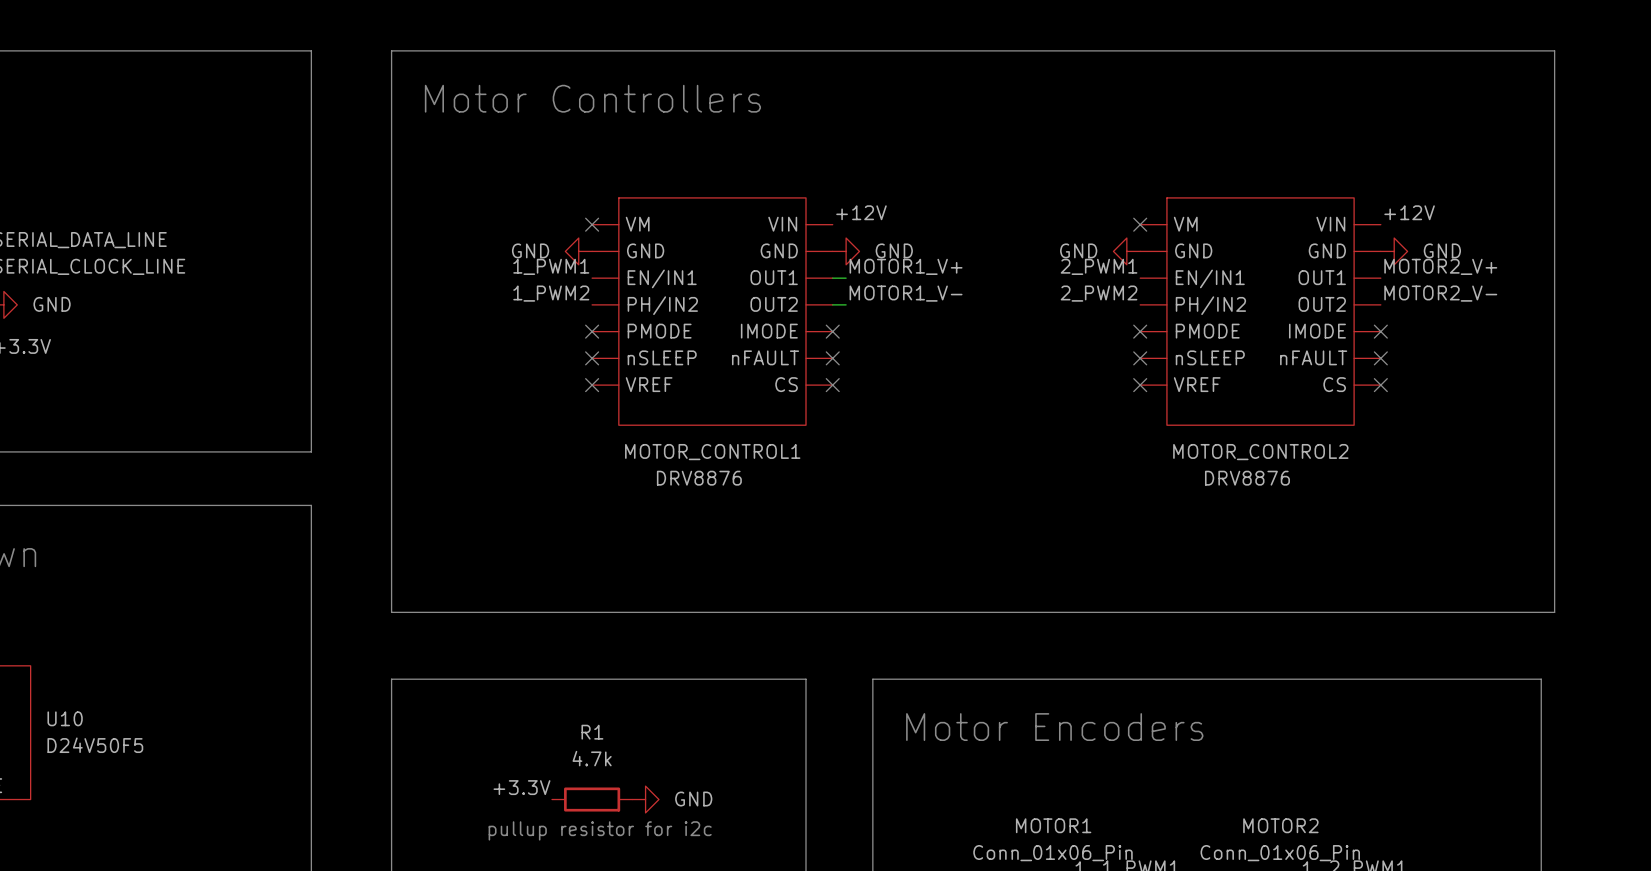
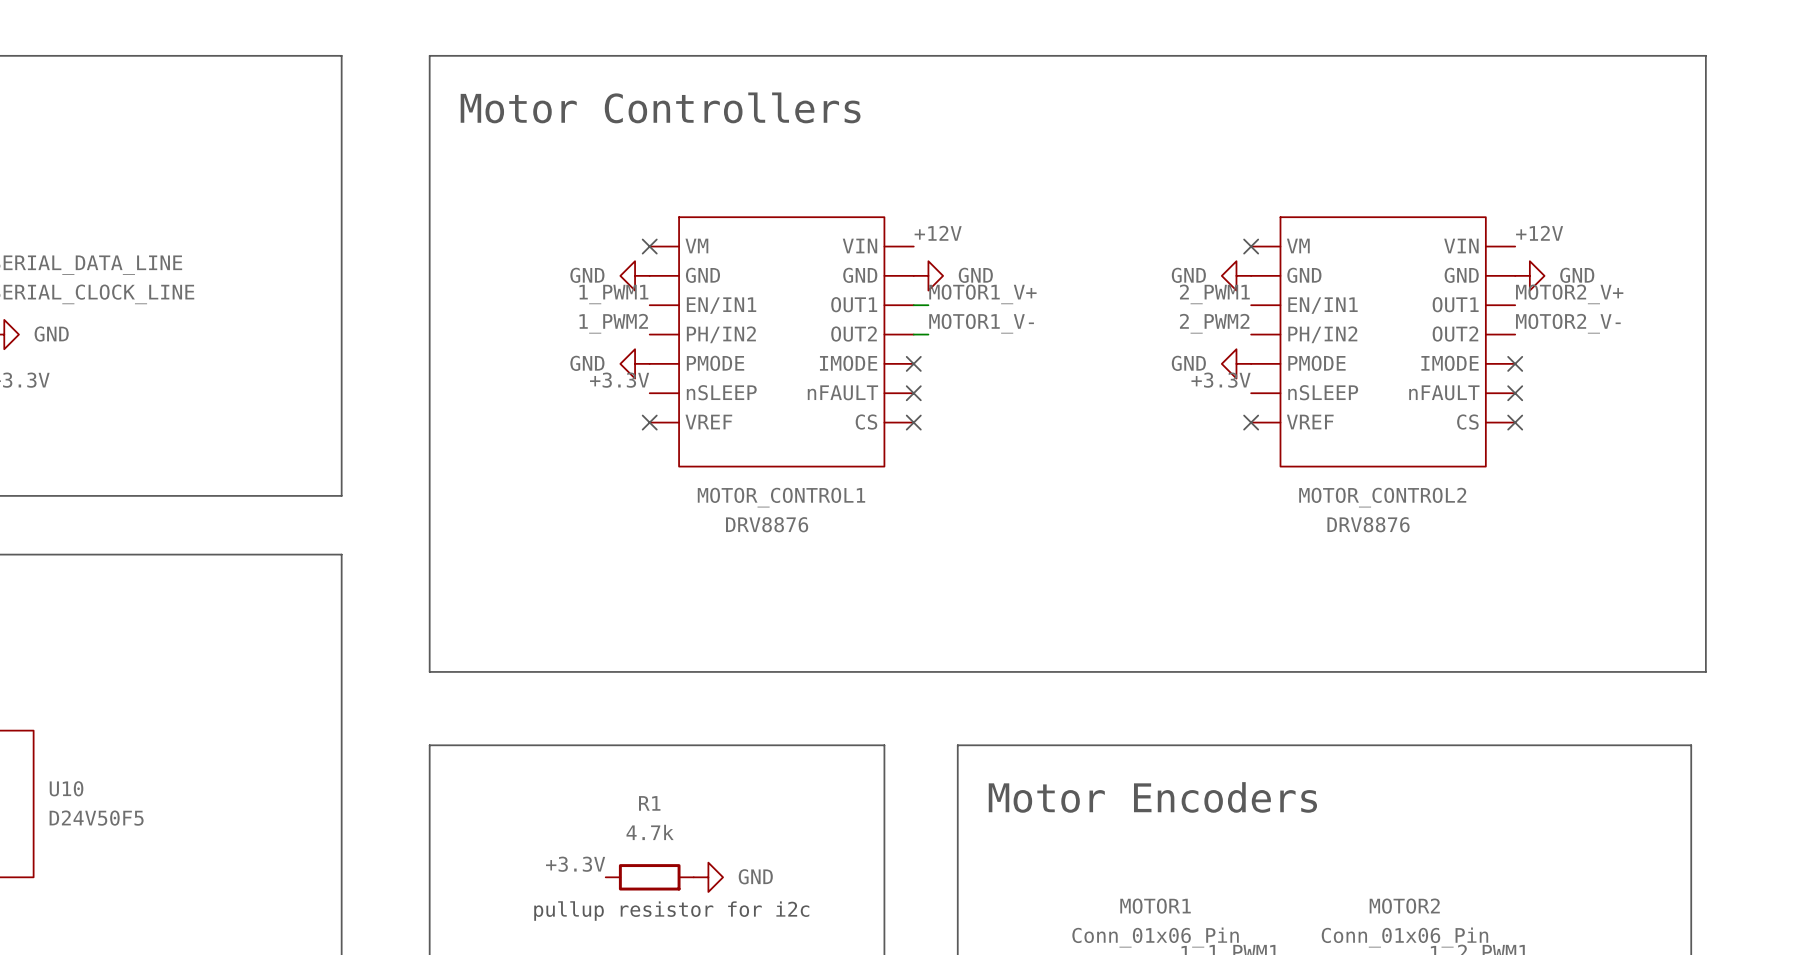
power symbol: none -> GND (635, 363)
no-connect mark: (592, 331) -> none
power symbol: none -> GND (1236, 363)
no-connect mark: (1140, 331) -> none
label: none -> +3.3V (619, 380)
label: none -> +3.3V (1221, 380)
no-connect mark: (592, 358) -> none
no-connect mark: (1140, 358) -> none

